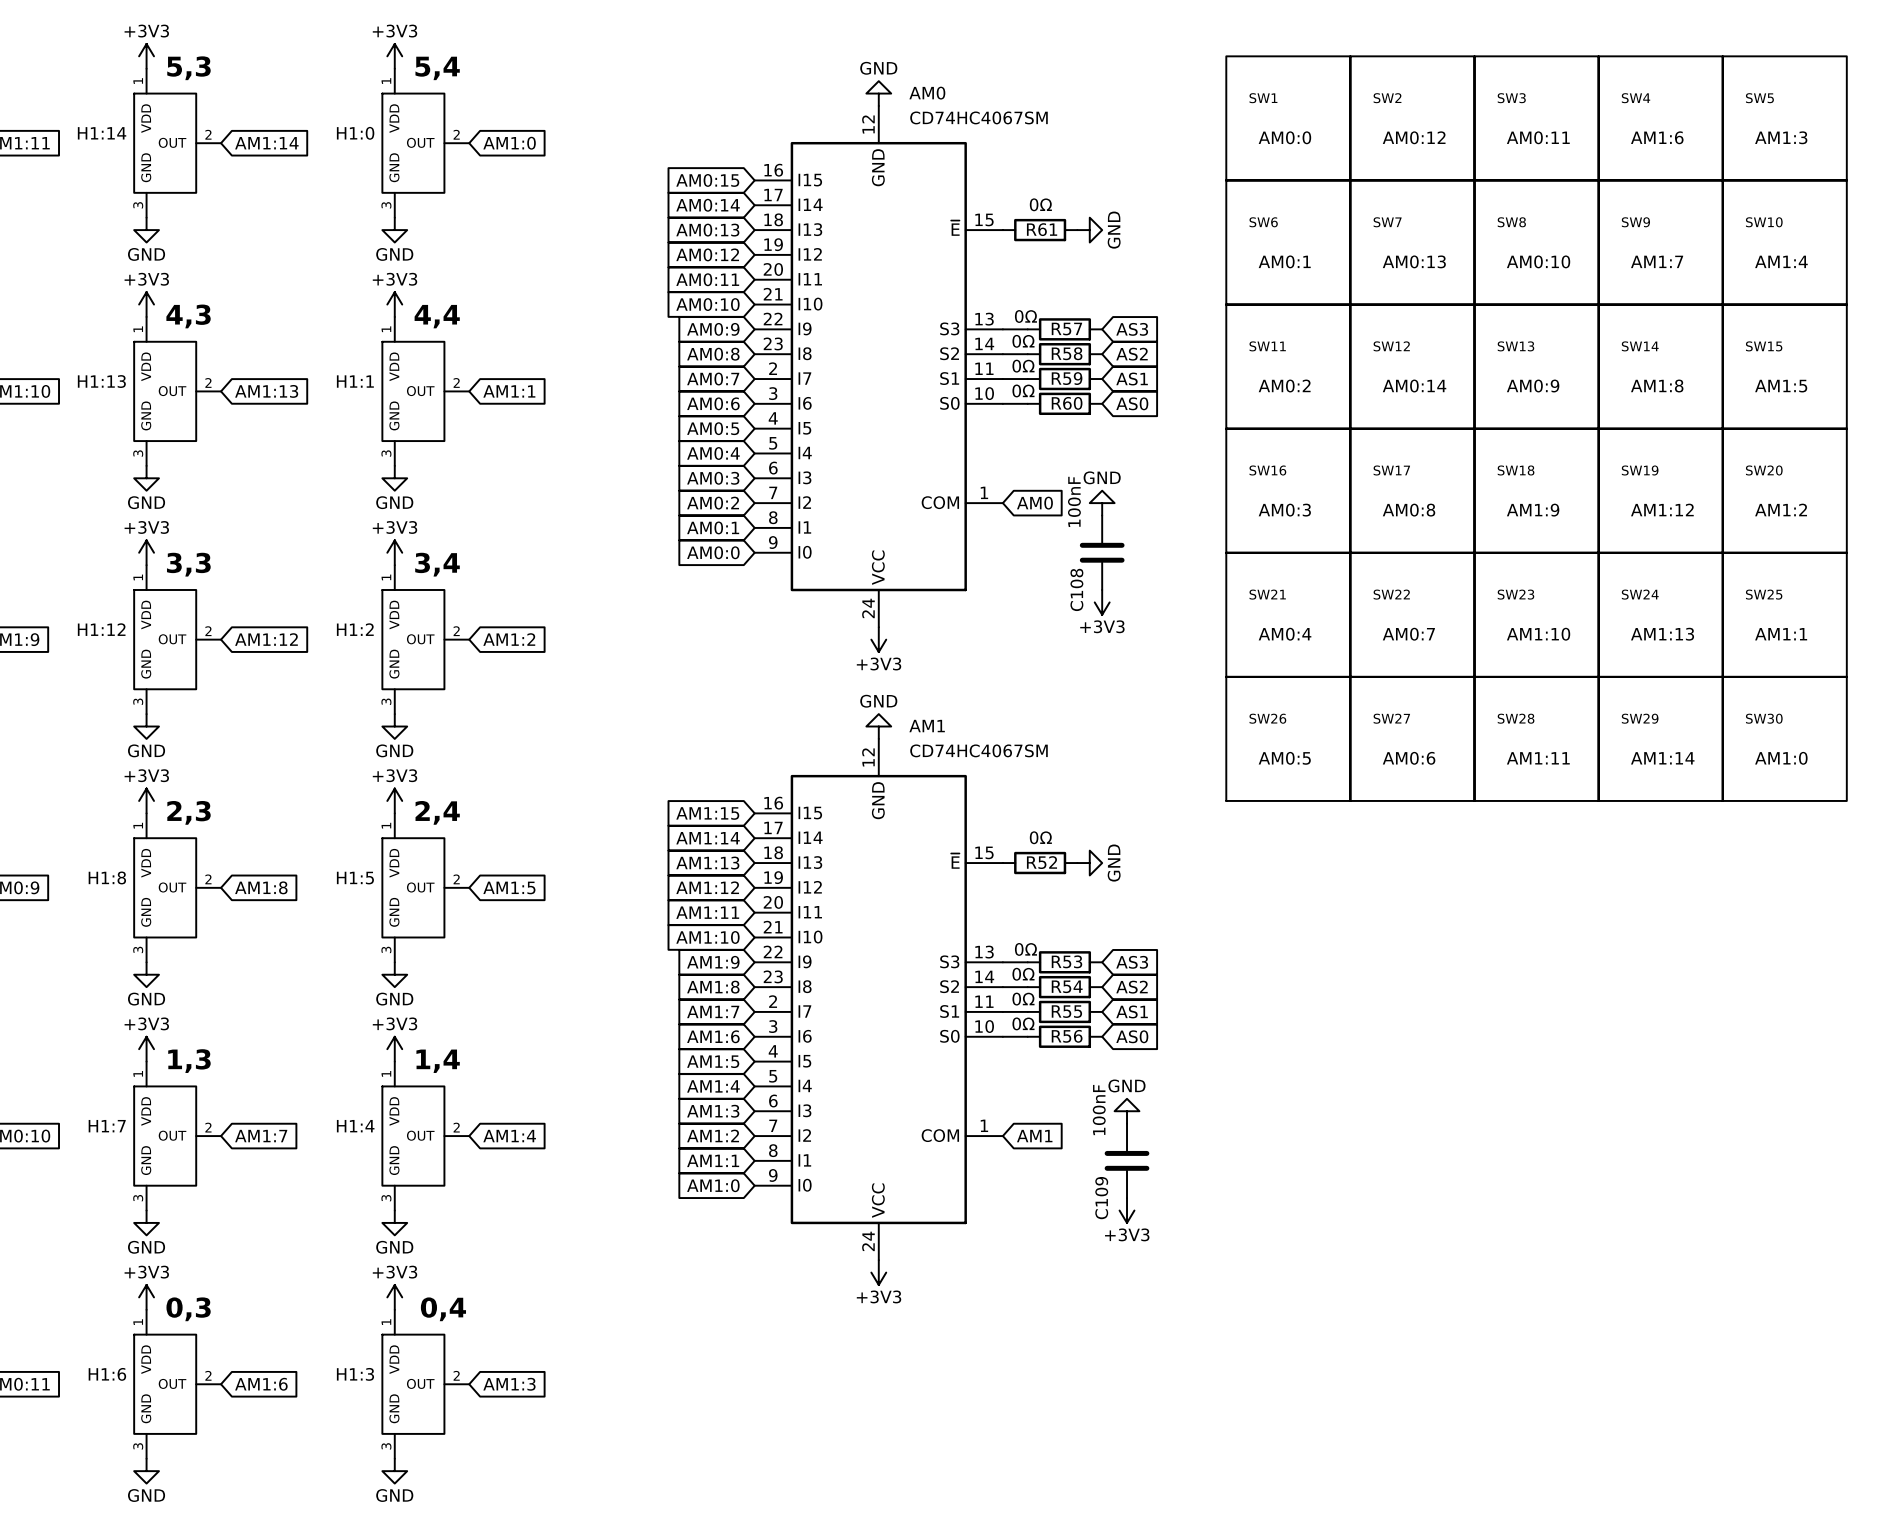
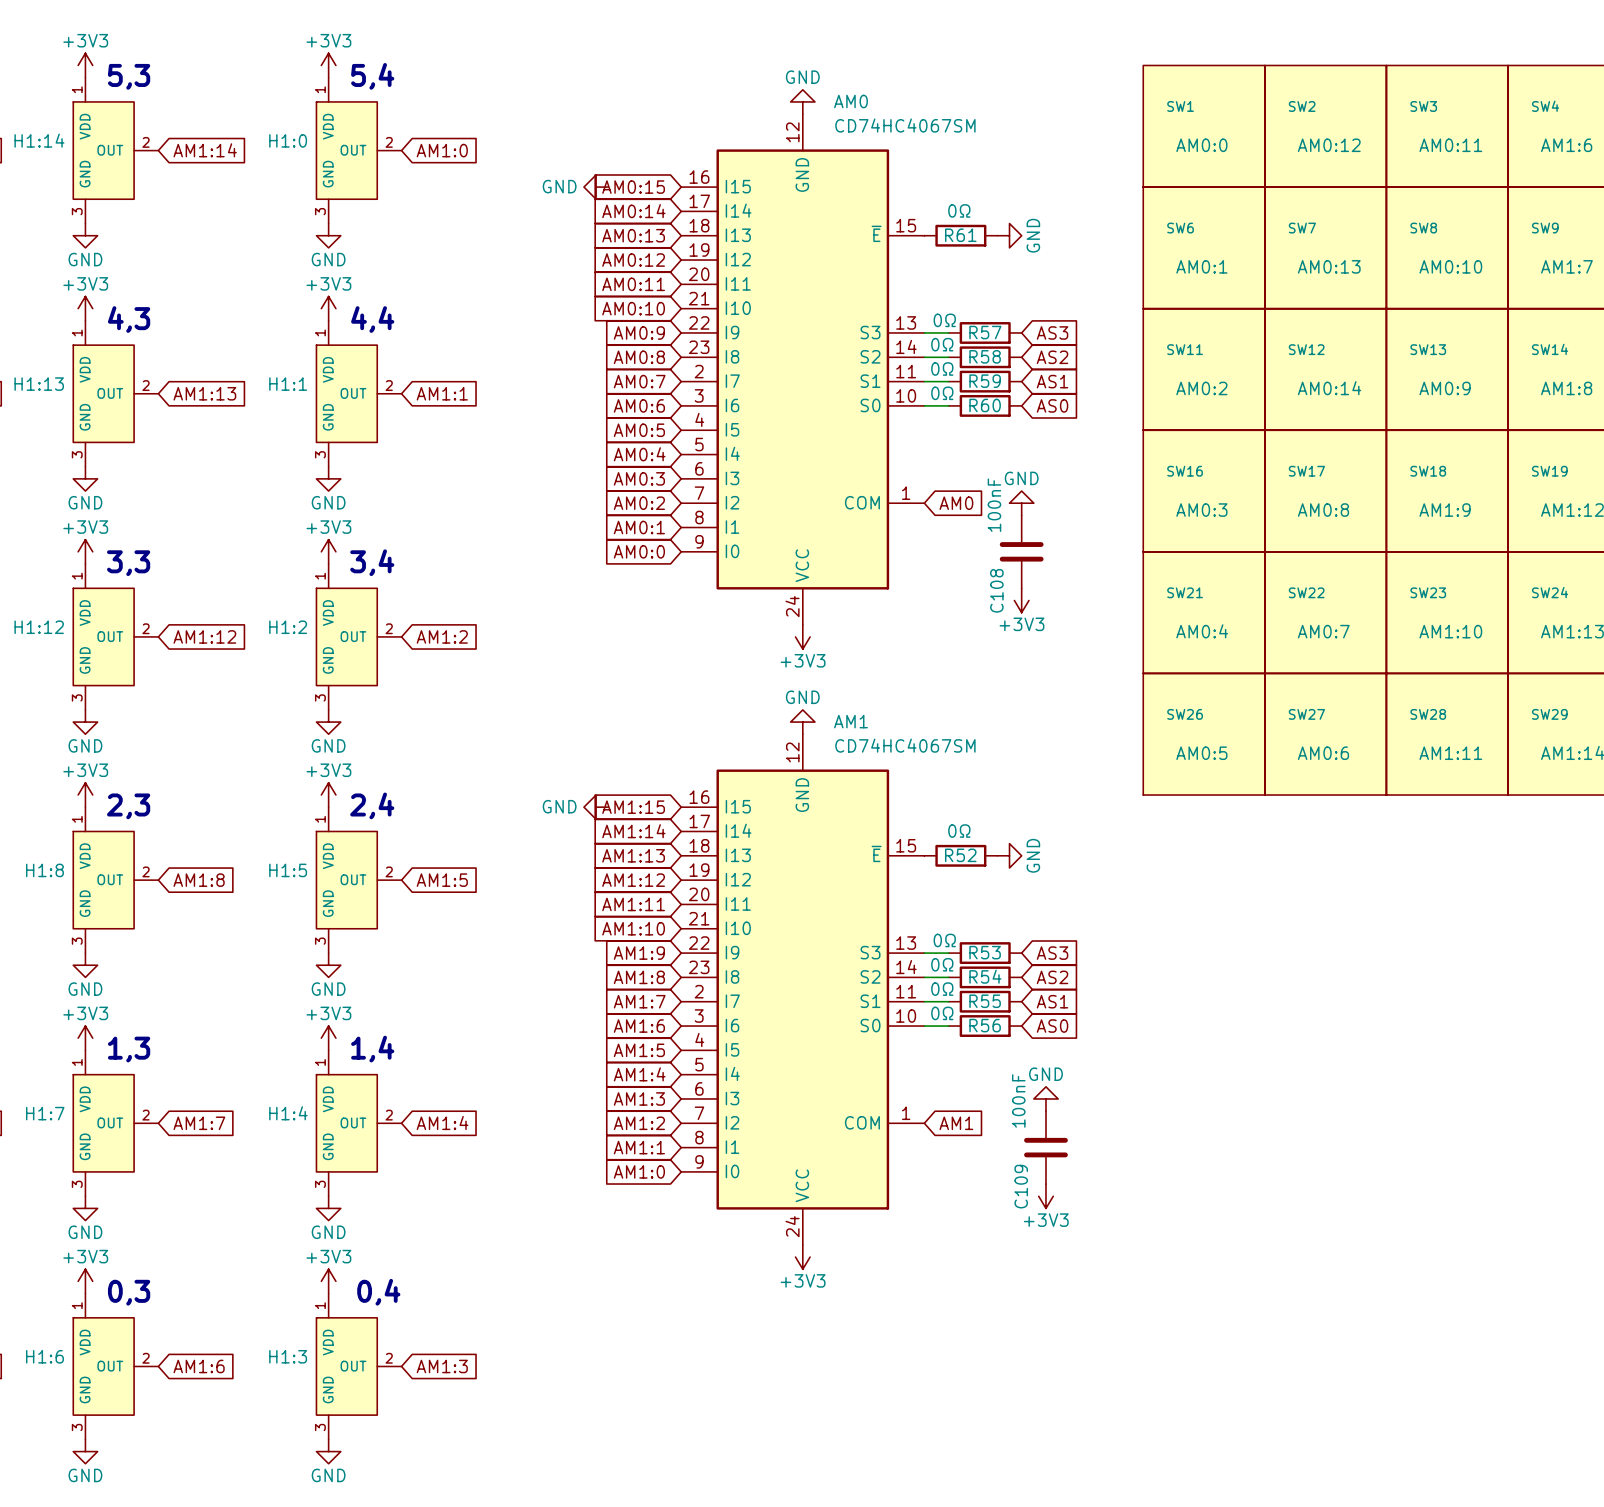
power symbol: none -> GND (596, 187)
power symbol: none -> GND (596, 807)

